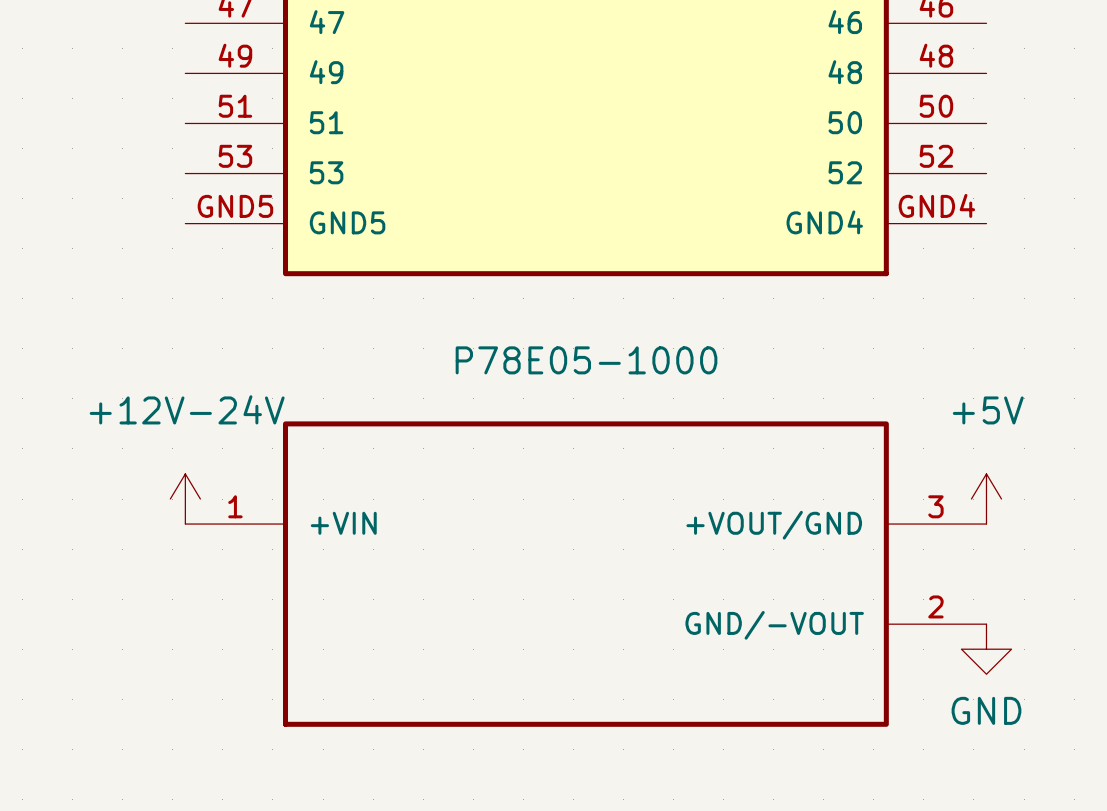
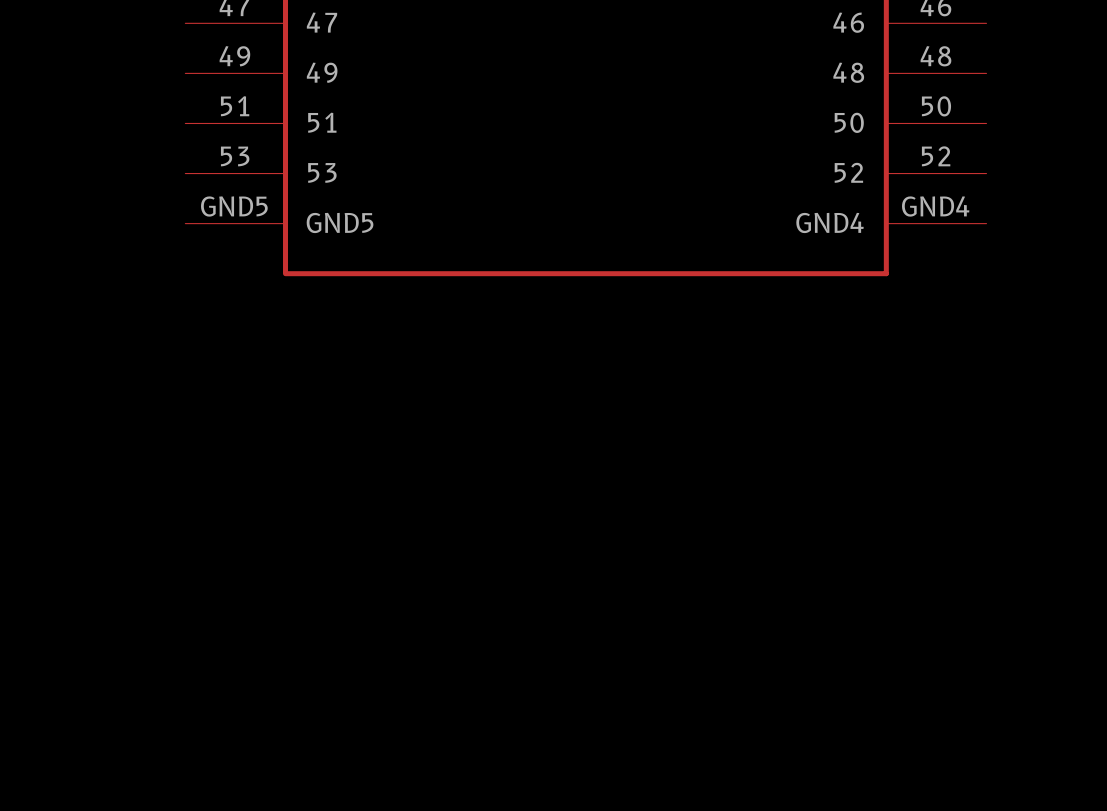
power symbol: +12V-24V (185, 499) -> none
power symbol: +5V (986, 499) -> none
part: P78E05-1000 (585, 574) -> none
power symbol: GND (986, 649) -> none

